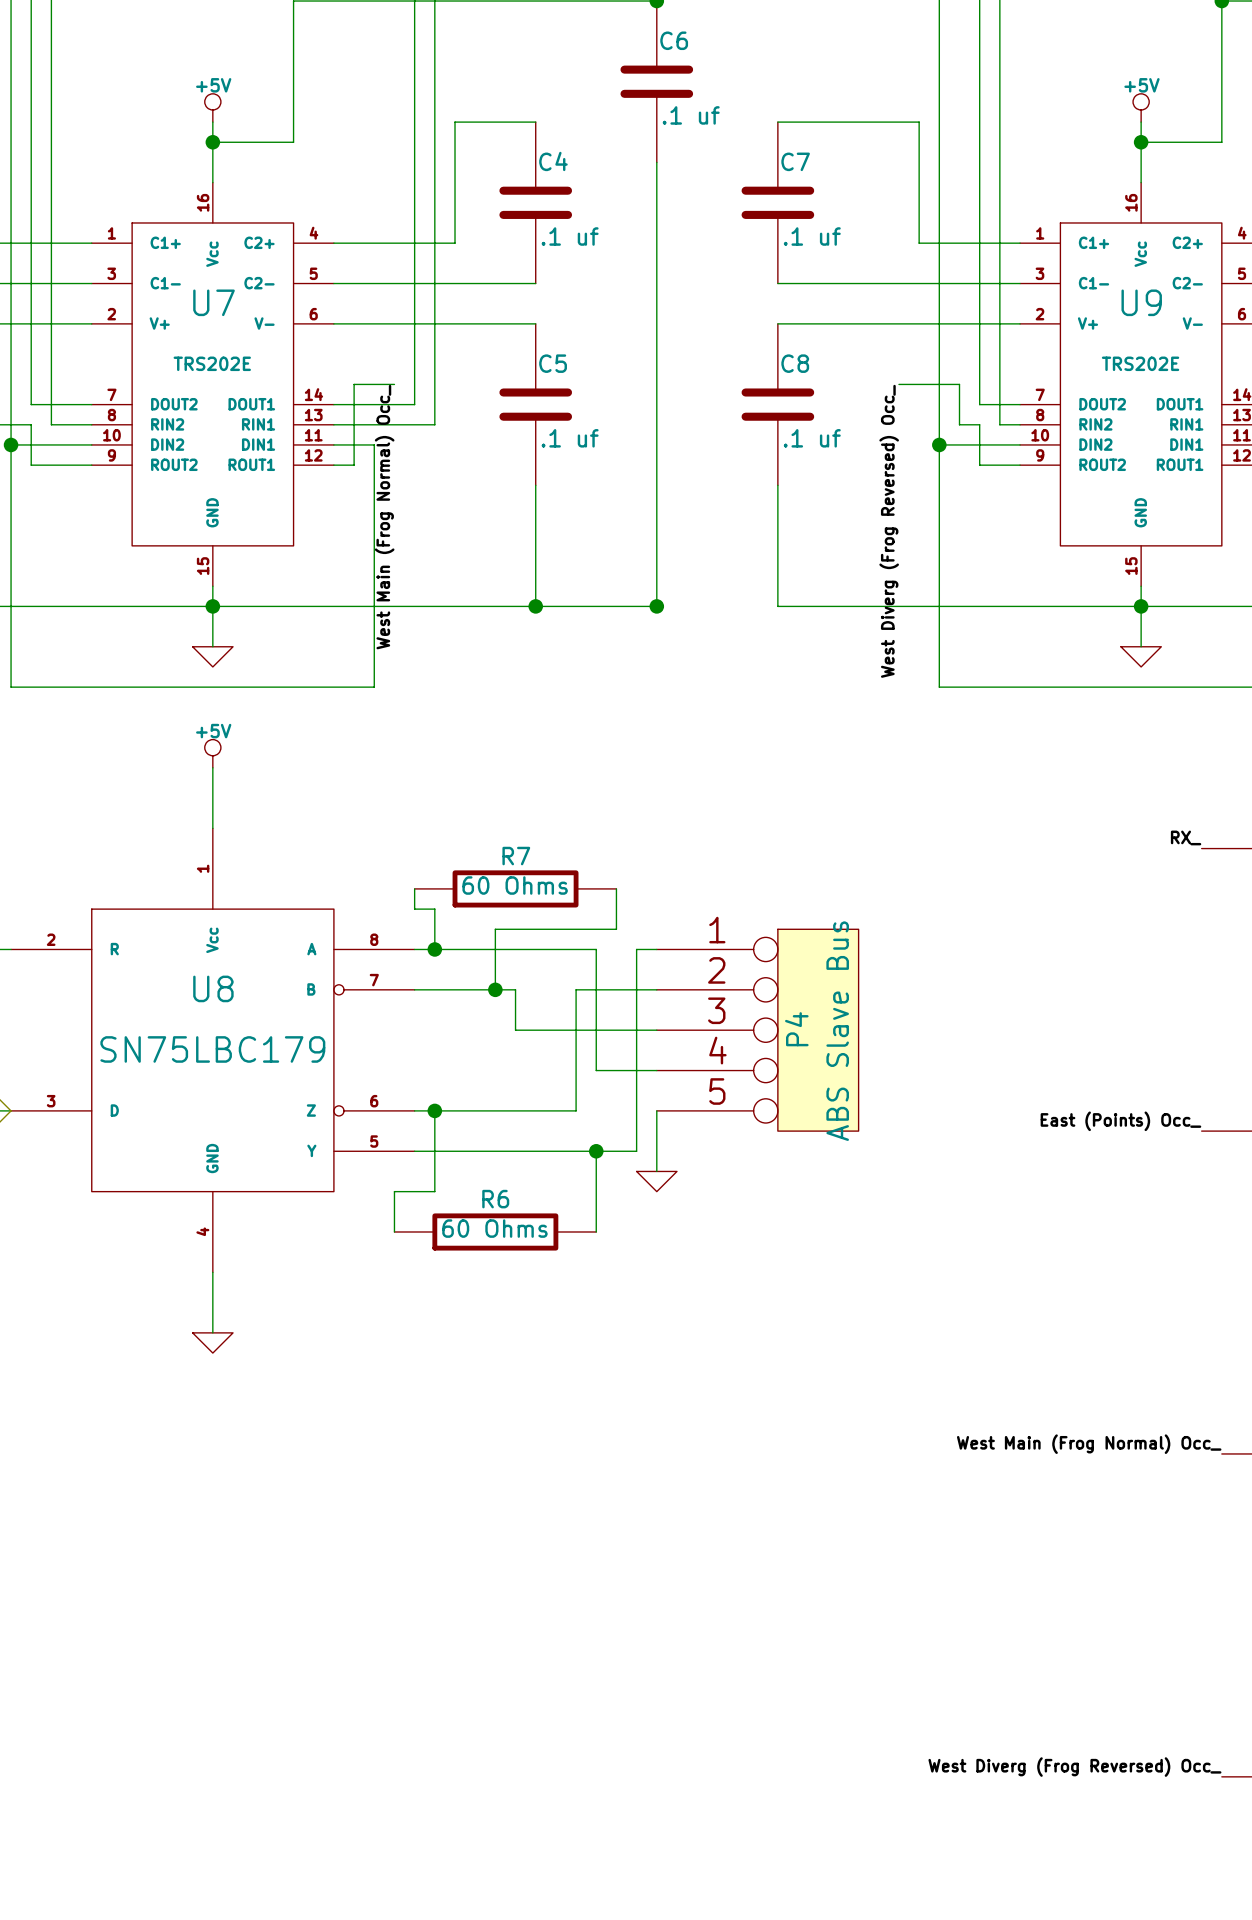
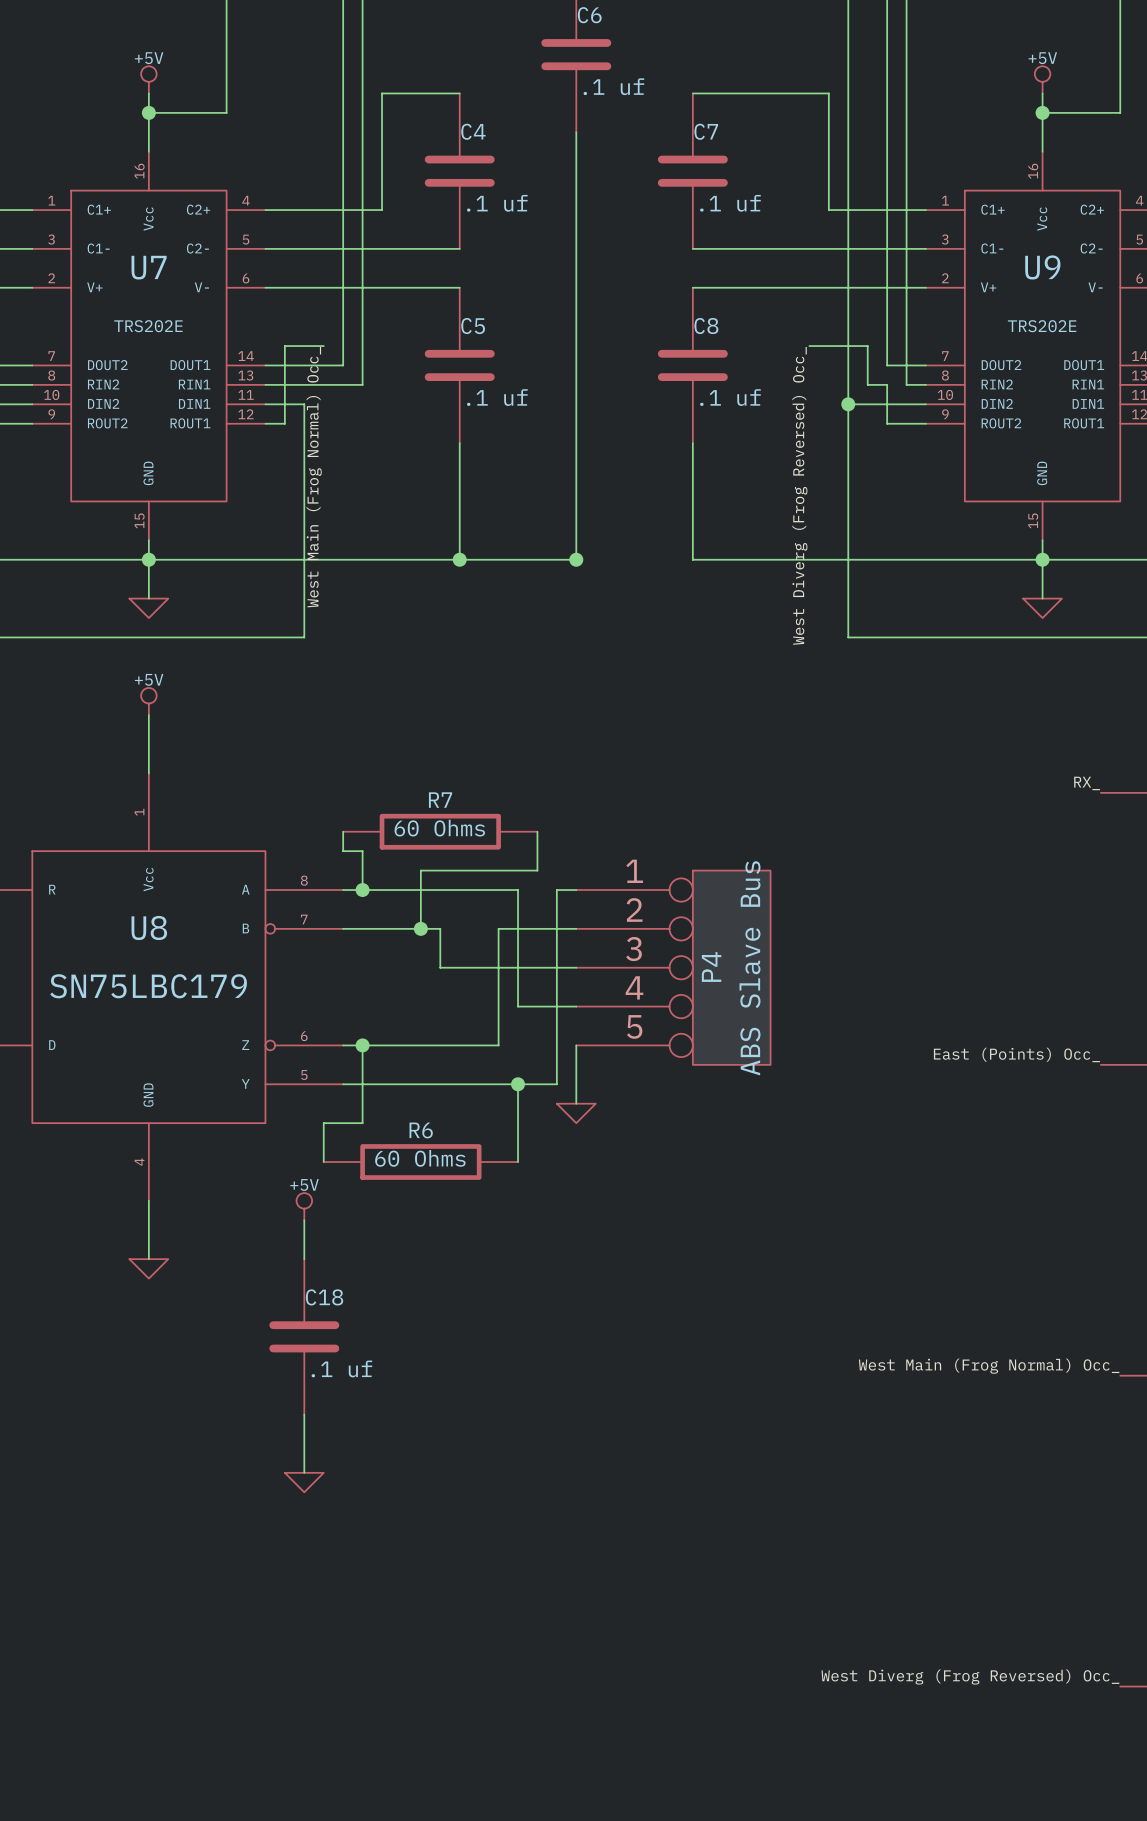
power symbol: none -> +5V (304, 1206)
wire: none -> (304, 1220) (304, 1259)
C18: none -> .1 uf (304, 1336)
wire: none -> (304, 1414) (304, 1472)
power symbol: none -> (304, 1482)

